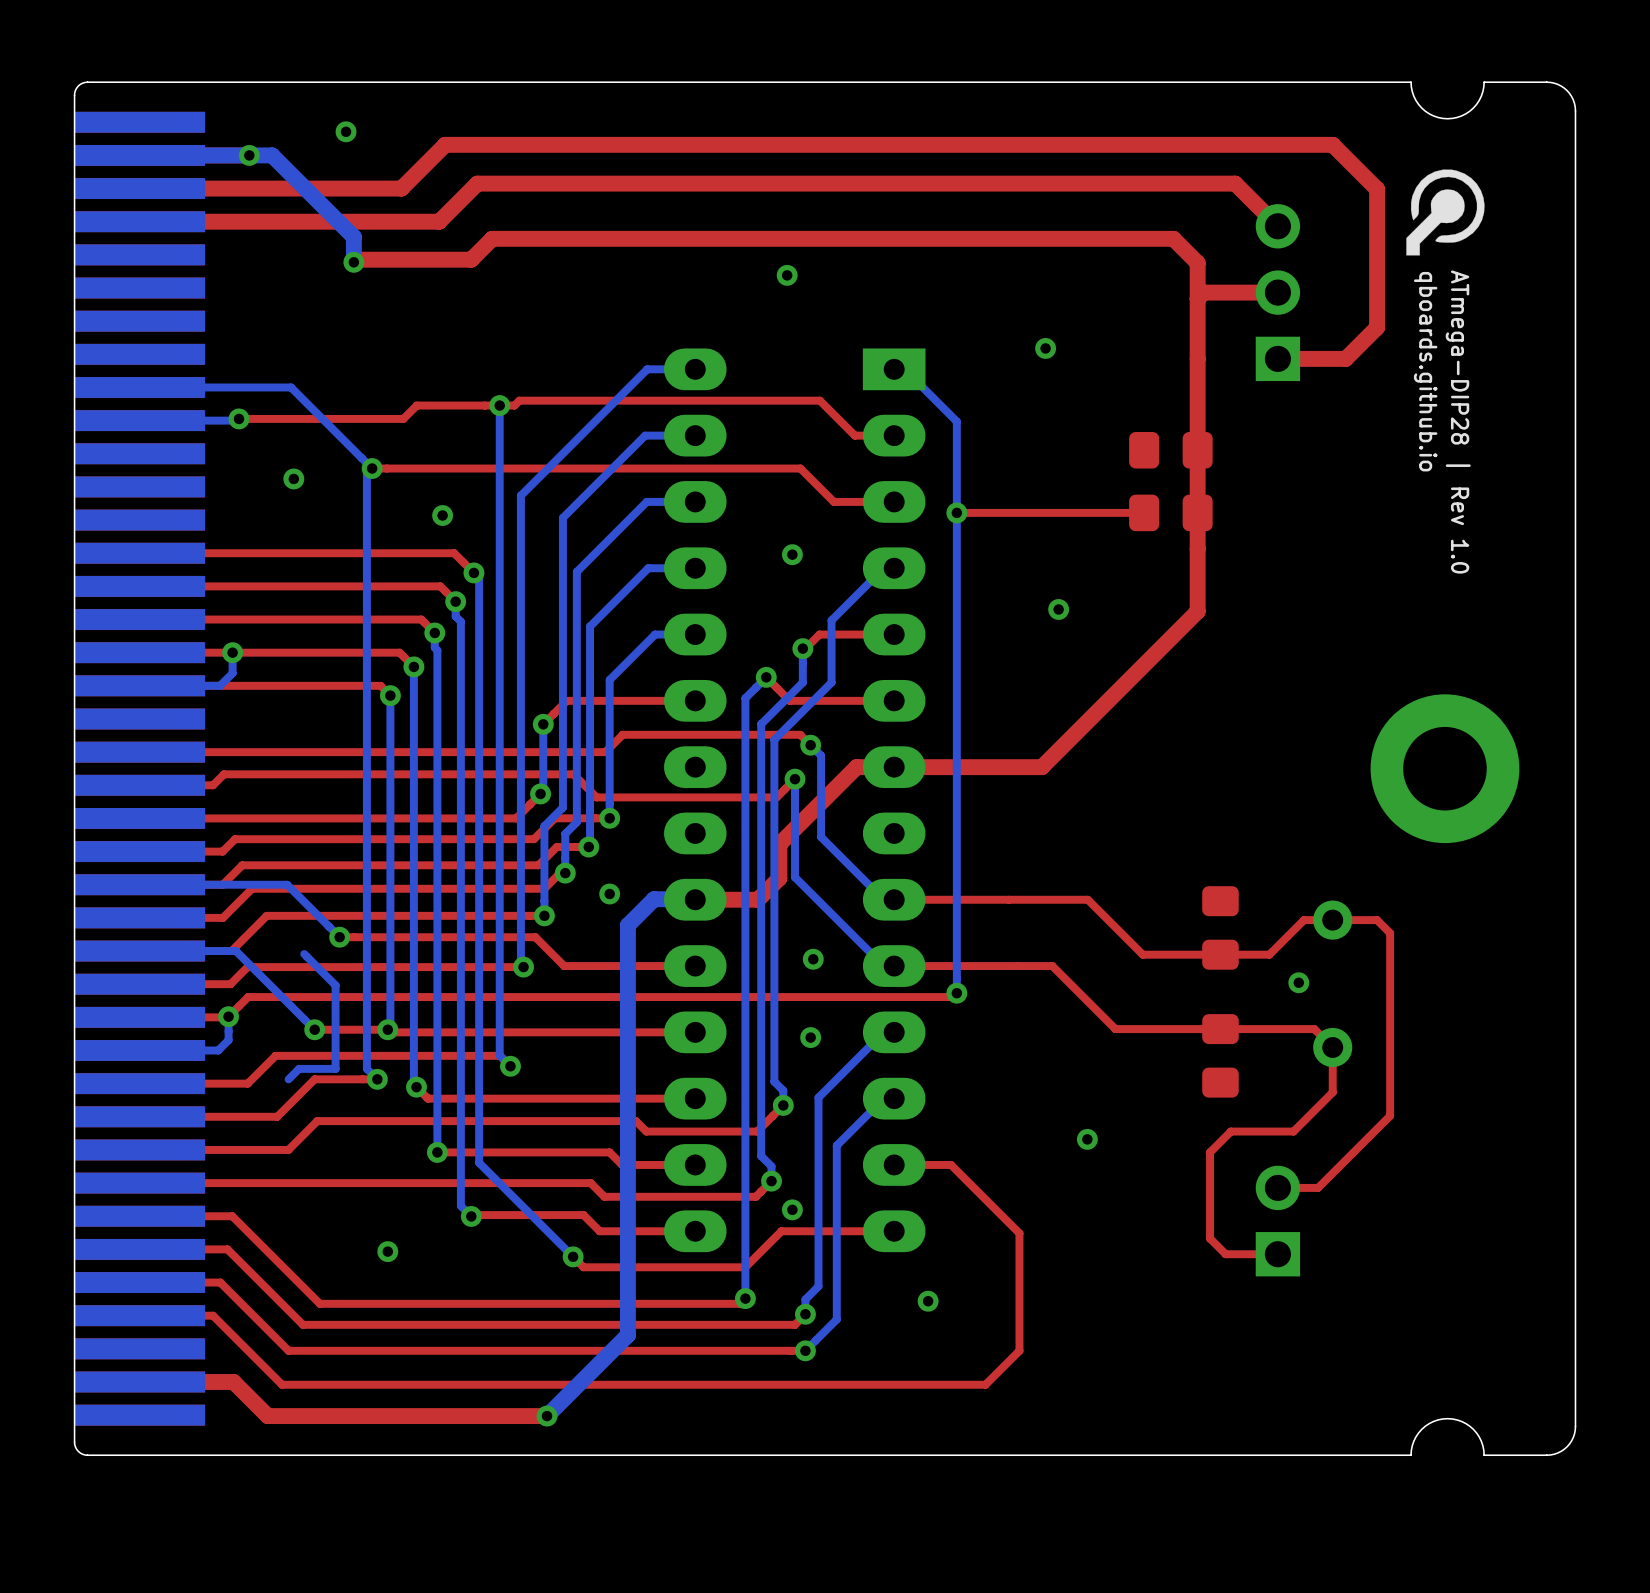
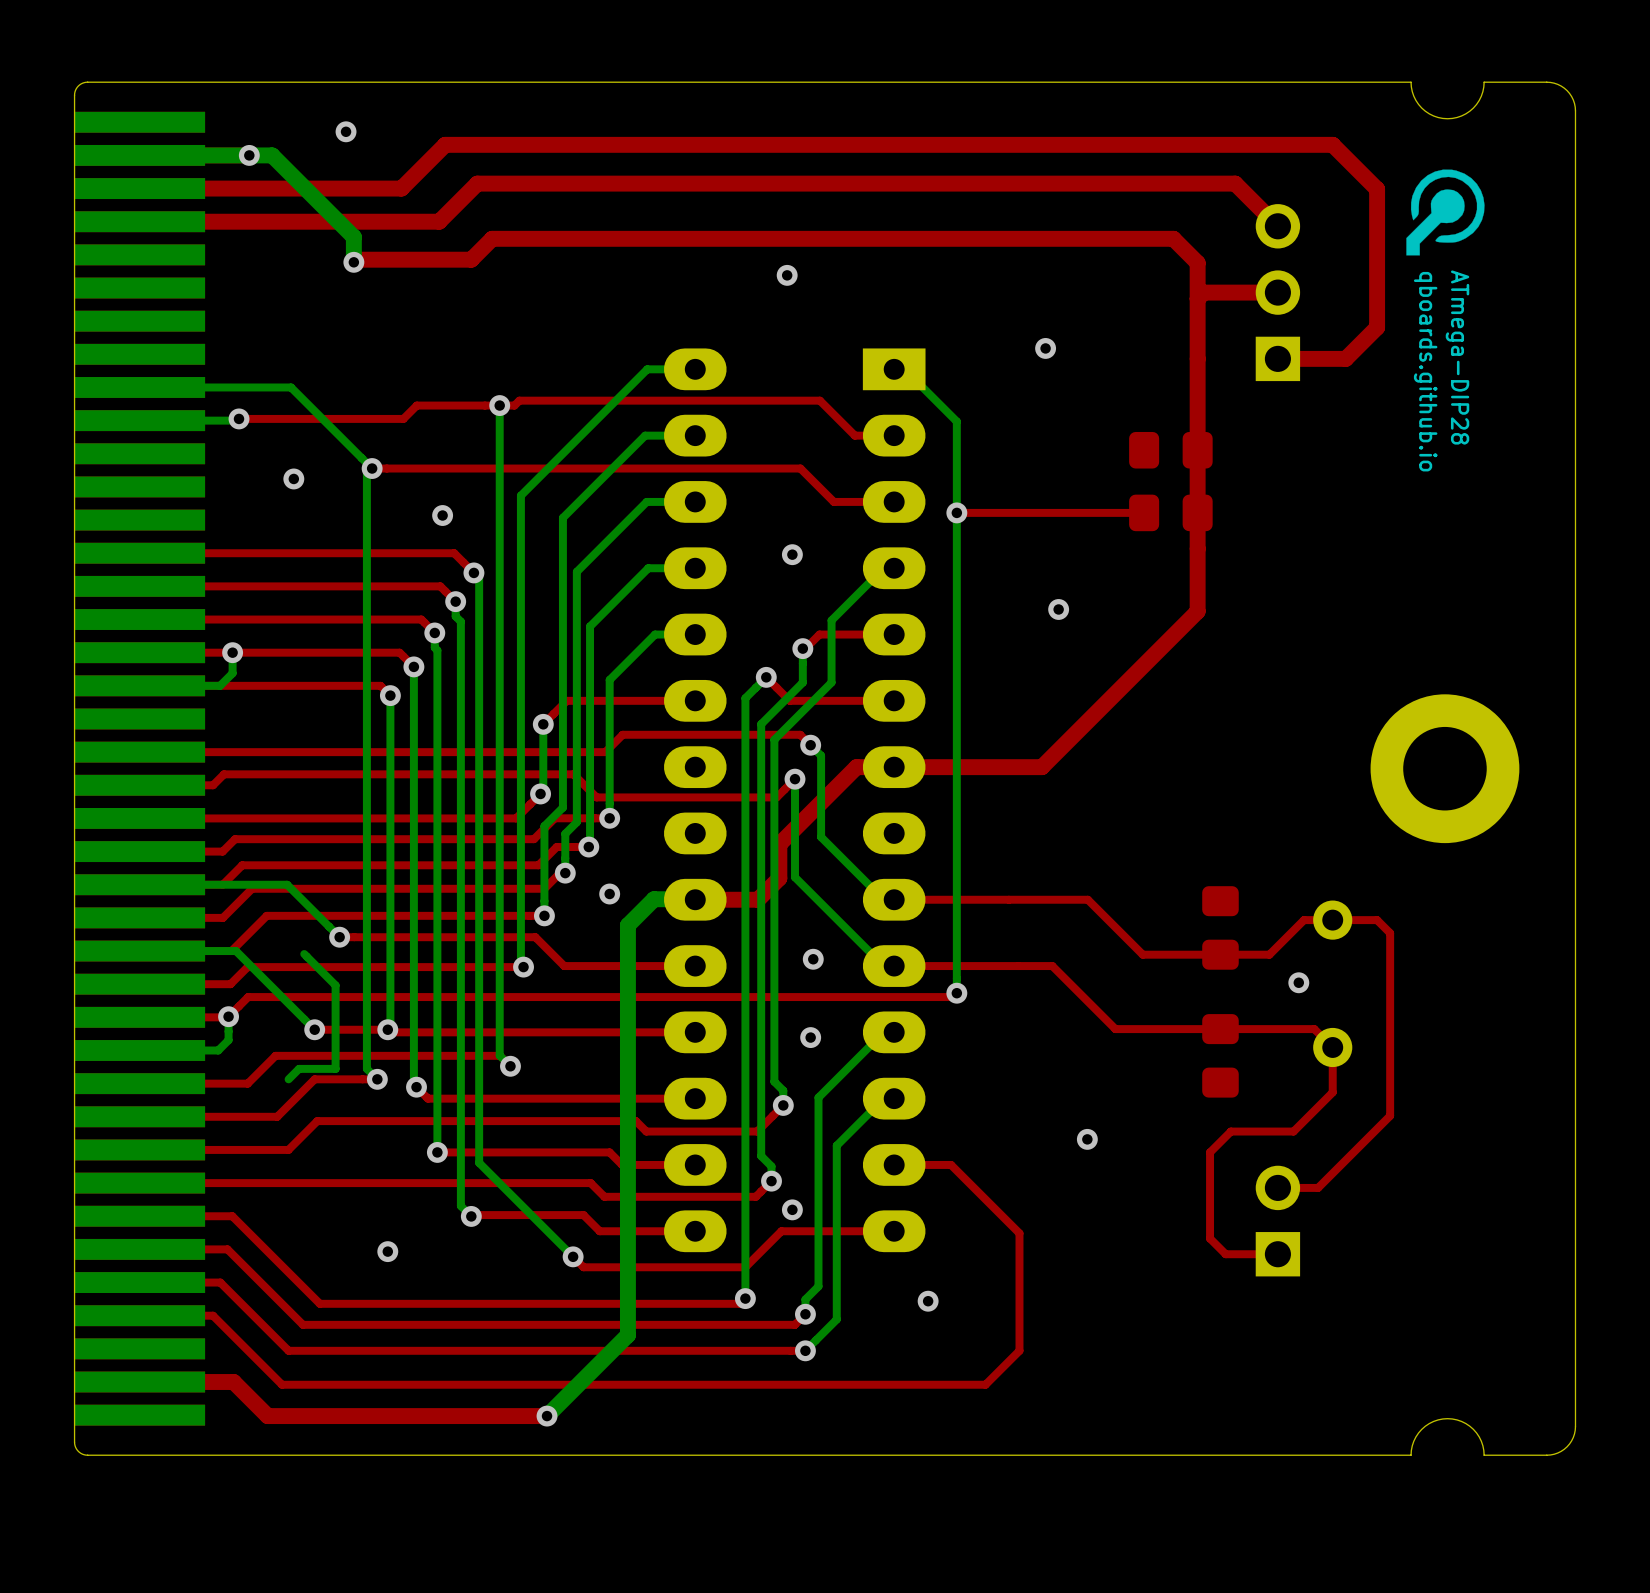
ATmega-DIP28 | Rev 1.0 name: ATmega-DIP28 | Rev 1.0 (1458, 422) -> ATmega-DIP28 (1457, 357)

